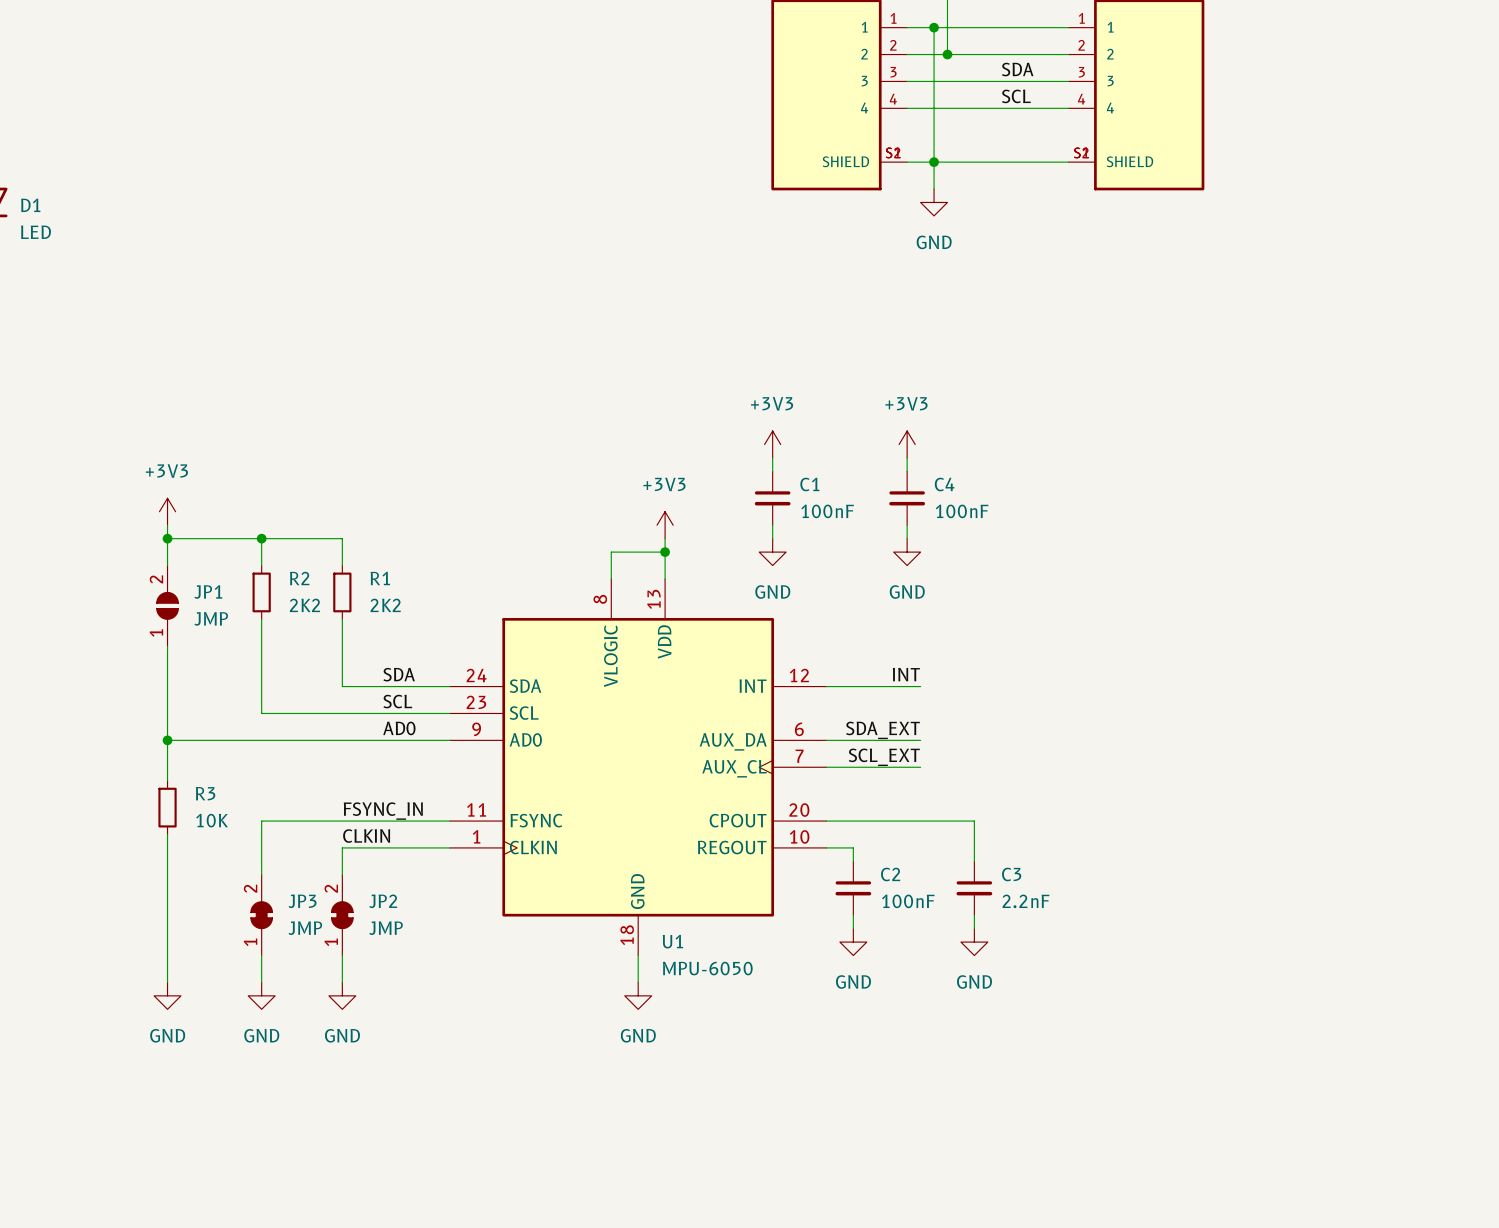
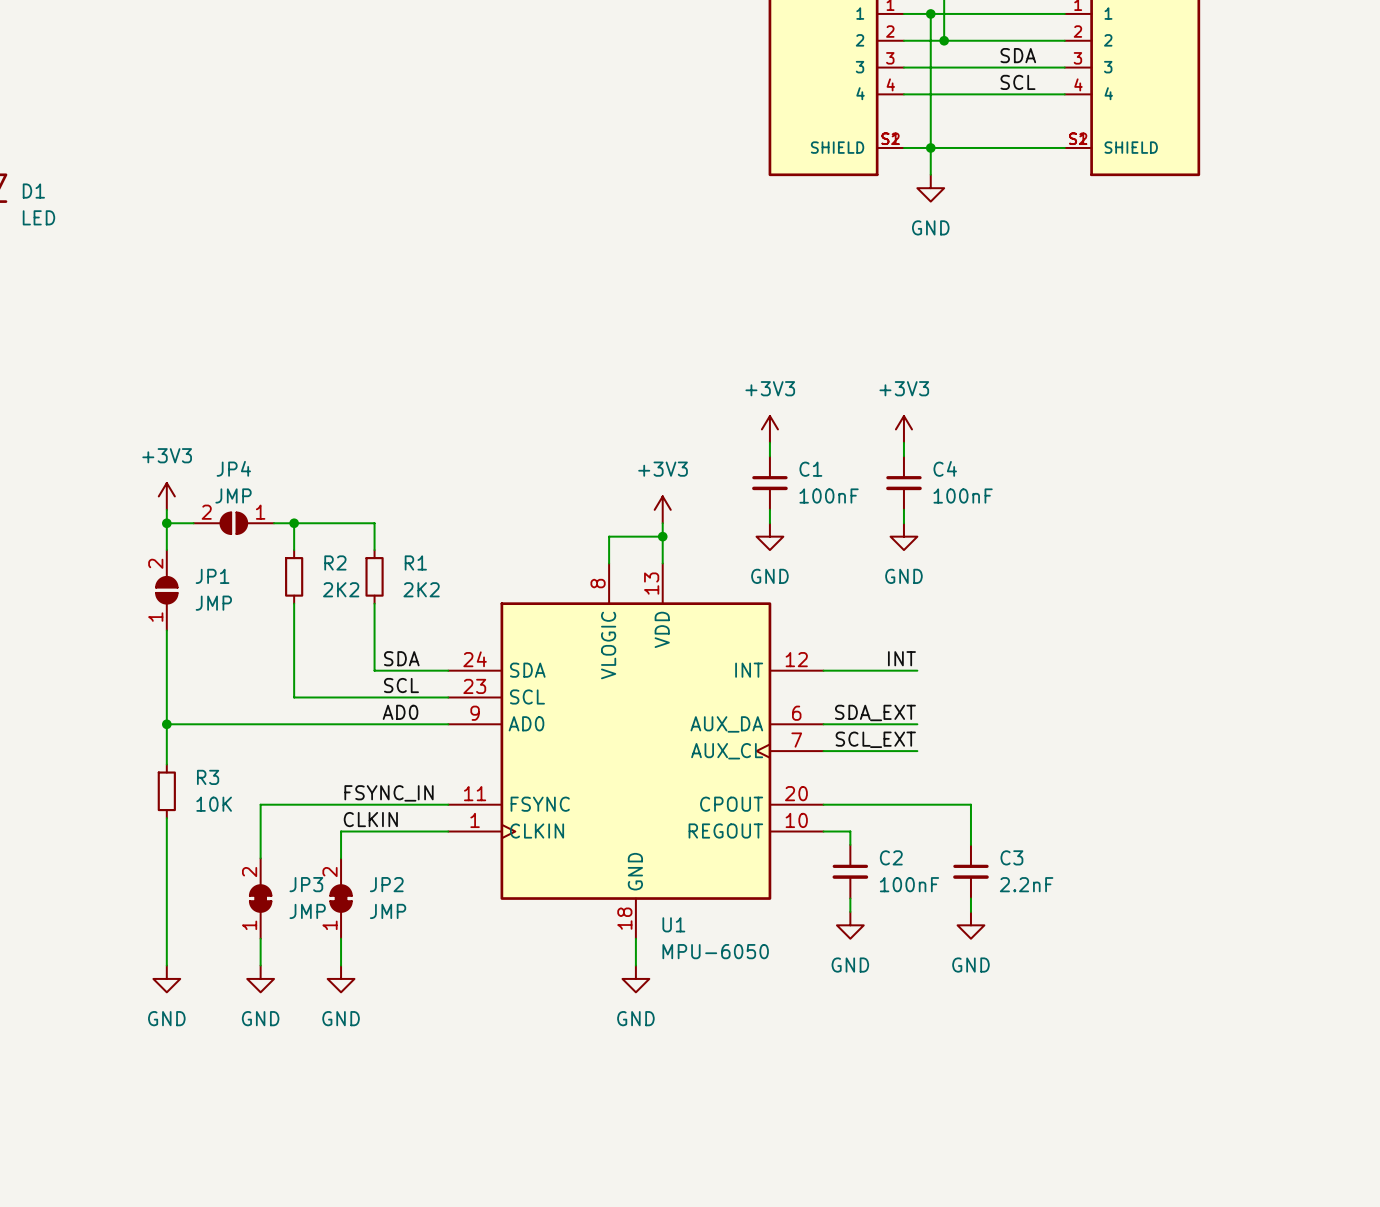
JP4: none -> JMP (233, 523)
wire: (261, 538) (261, 565) -> (294, 523) (294, 550)
junction position: (261, 538) -> (294, 523)
wire: (342, 538) (342, 565) -> (341, 523) (374, 523) (374, 550)
R2 position: (261, 592) -> (294, 576)
R1 position: (342, 592) -> (374, 576)
wire: (261, 619) (261, 713) (295, 713) -> (294, 603) (294, 697)
wire: (342, 619) (342, 686) (375, 686) -> (374, 603) (374, 670)

